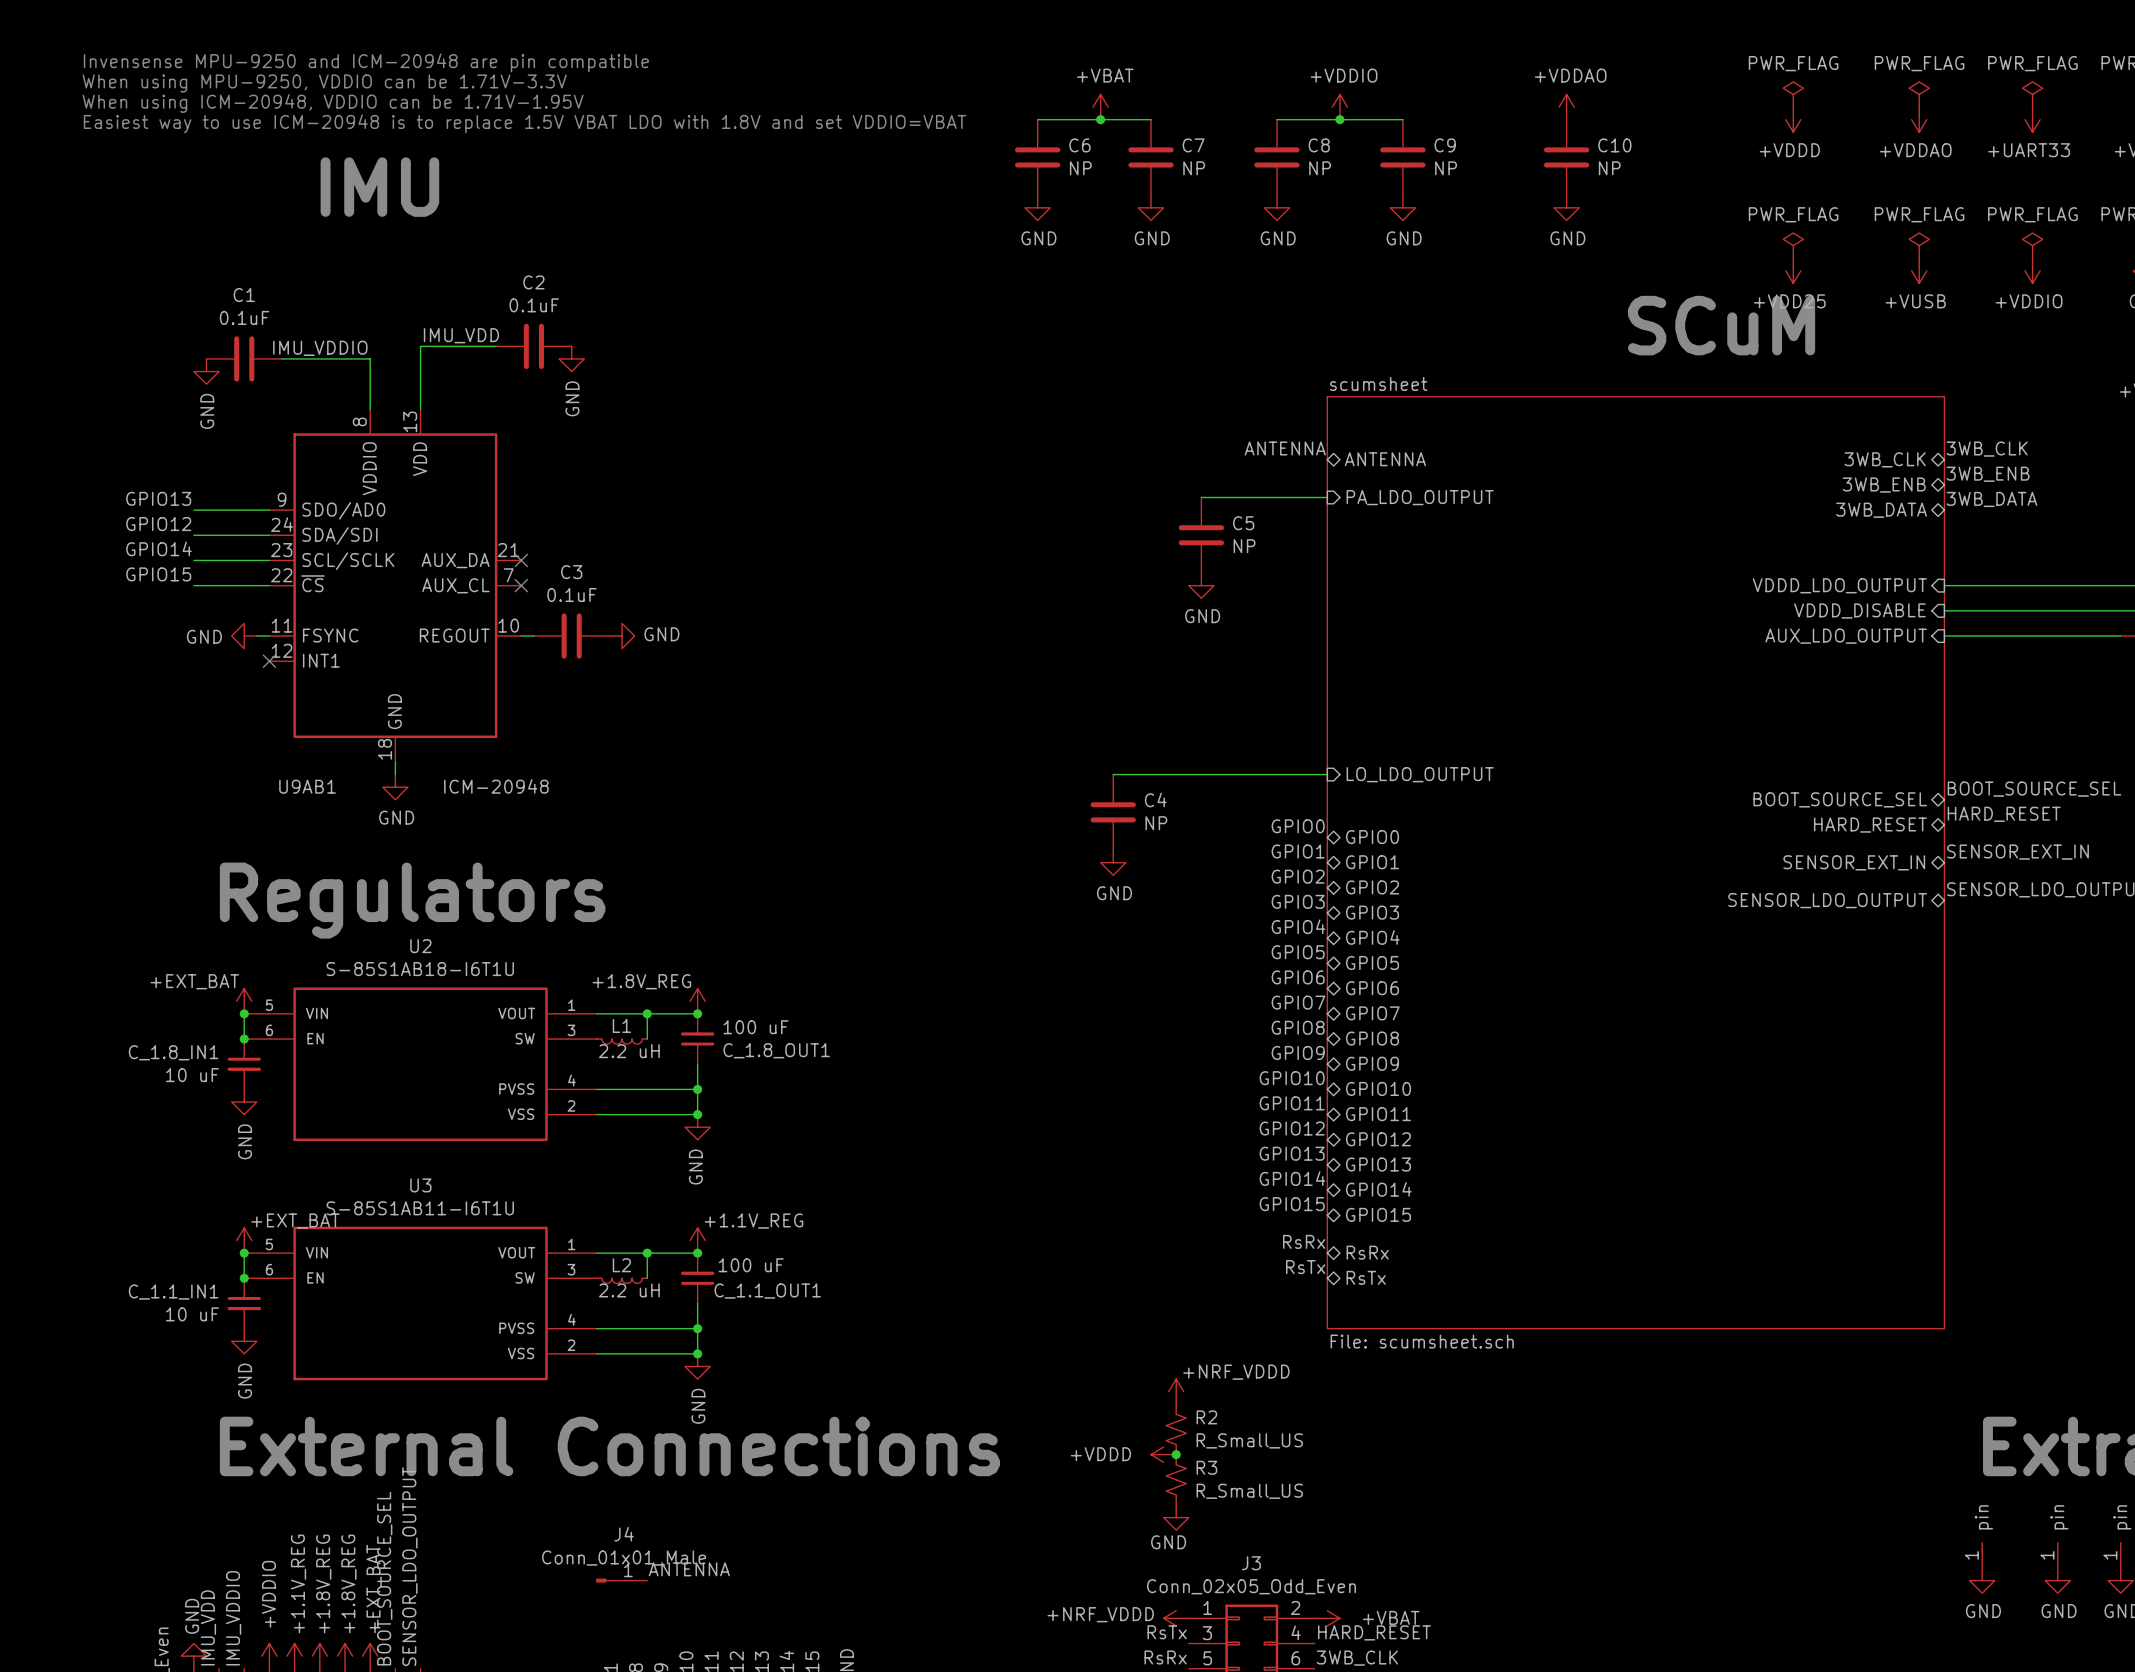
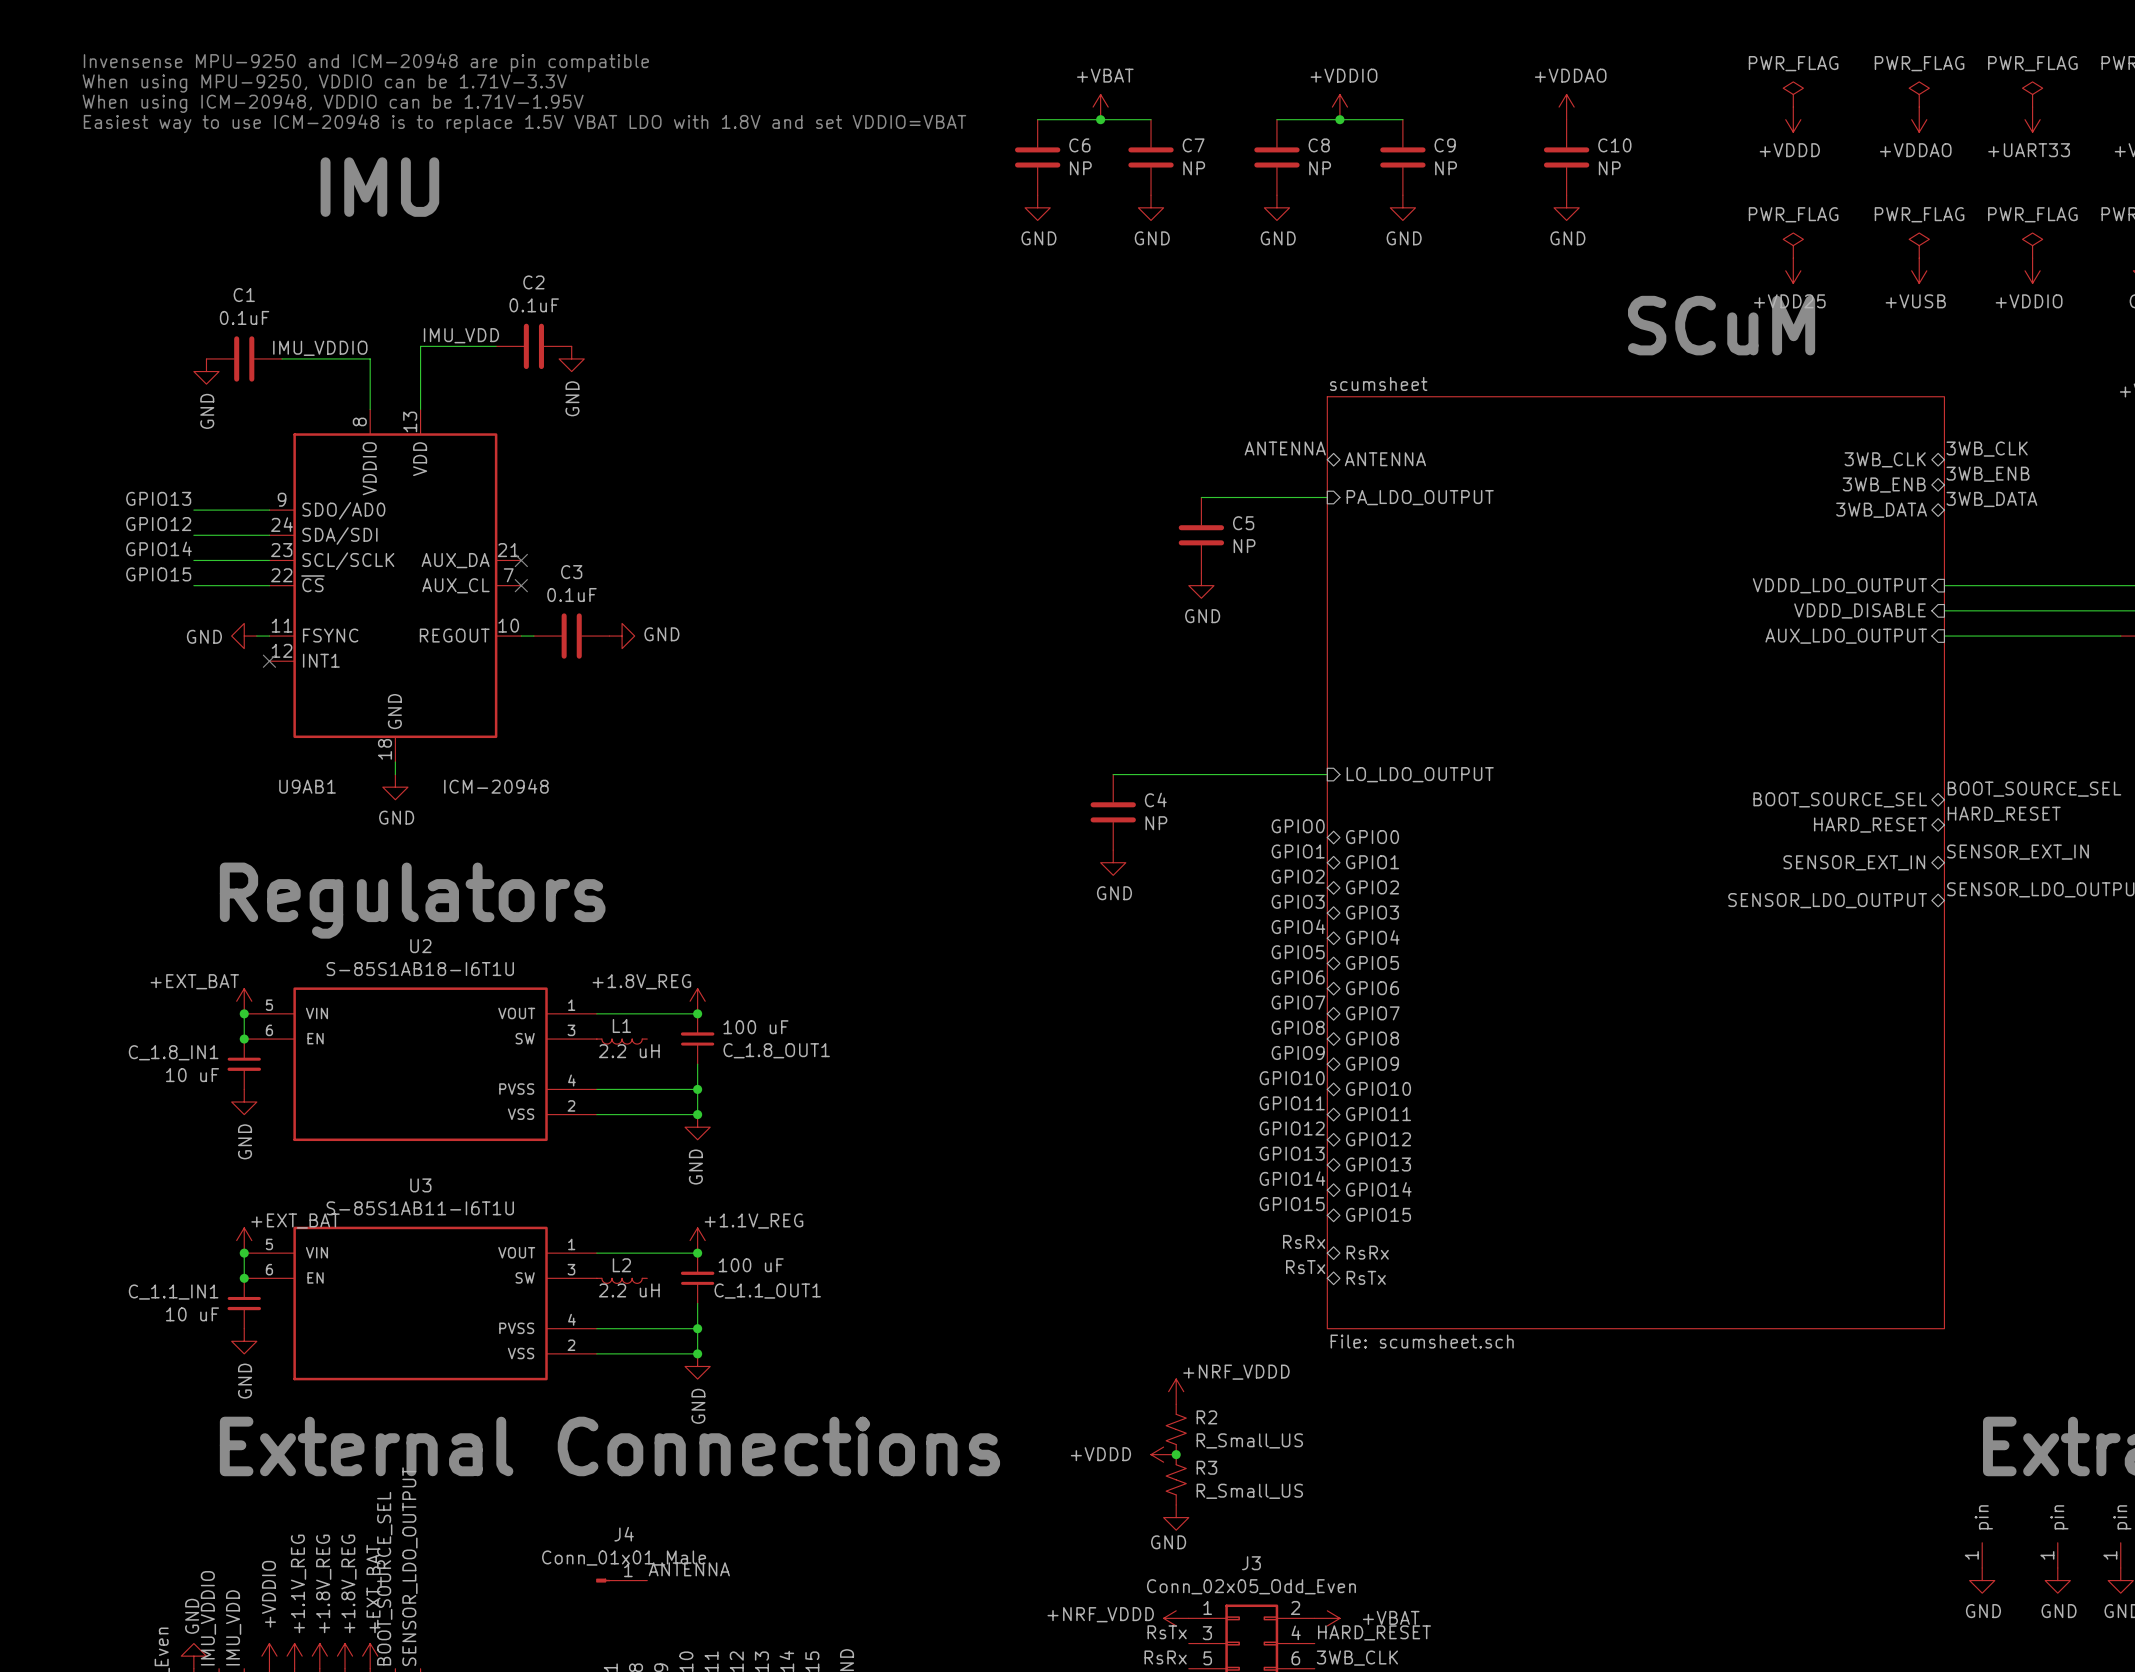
wire: (647, 1013) (647, 1039) -> none
junction: (647, 1013) -> none
wire: (647, 1253) (647, 1278) -> none
junction: (647, 1253) -> none
label: IMU_VDDIO (233, 1618) -> IMU_VDD (233, 1627)
label: IMU_VDD (208, 1627) -> IMU_VDDIO (208, 1618)

